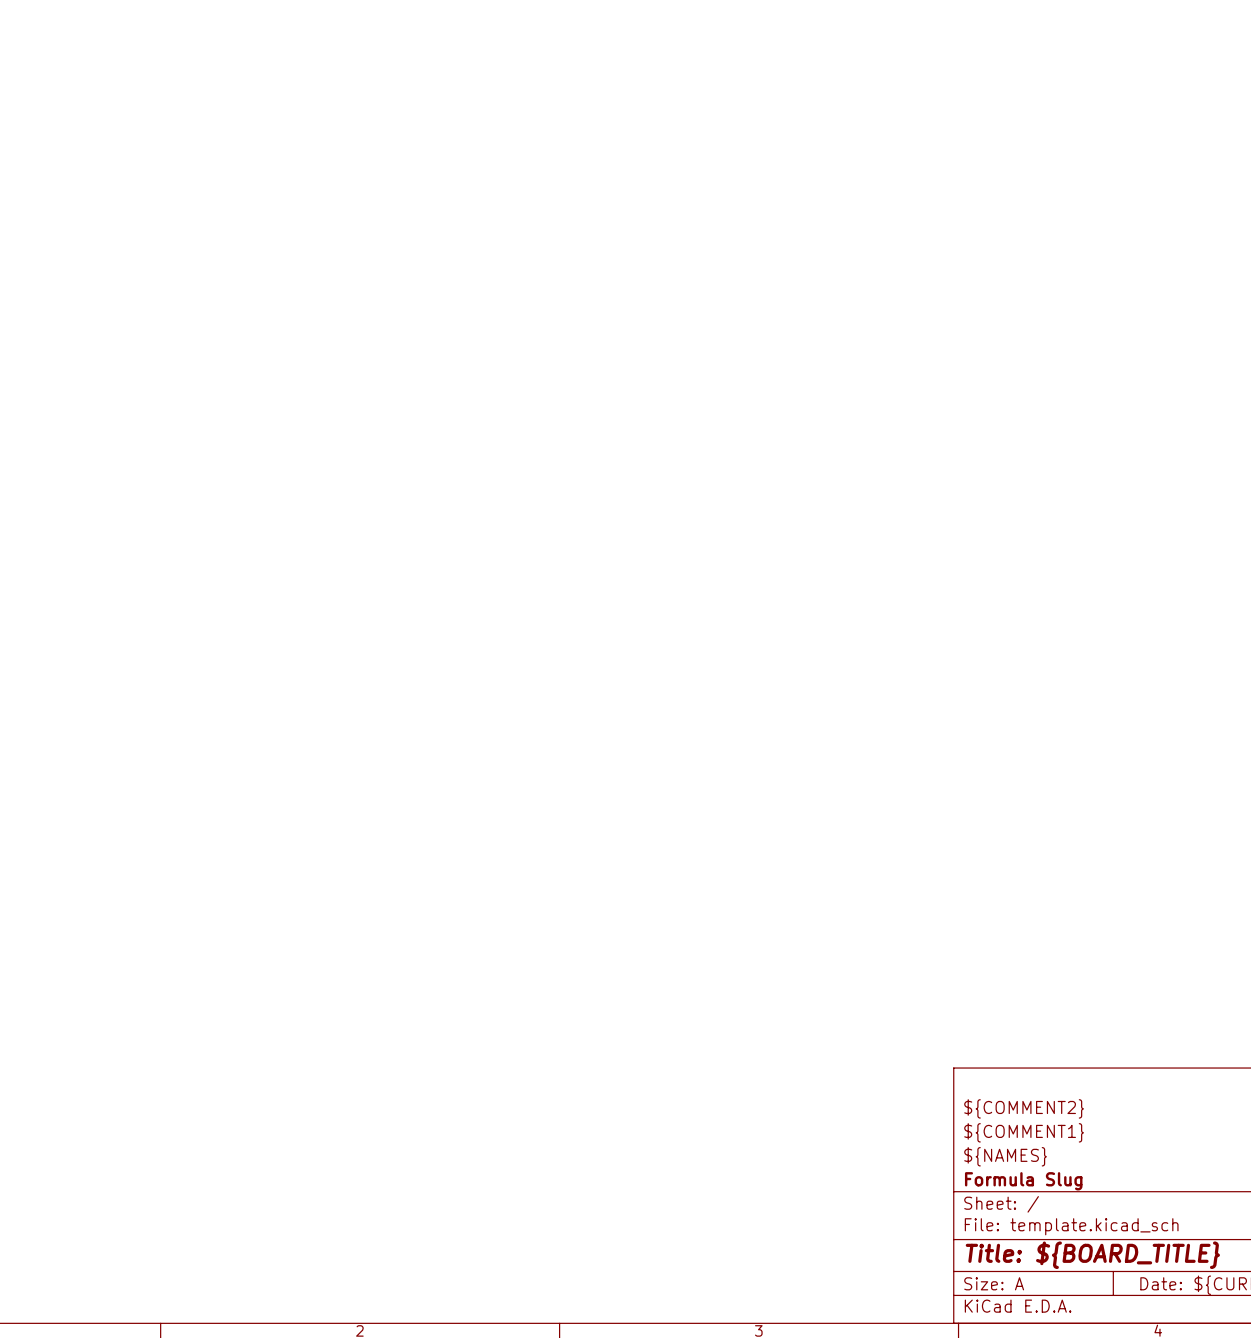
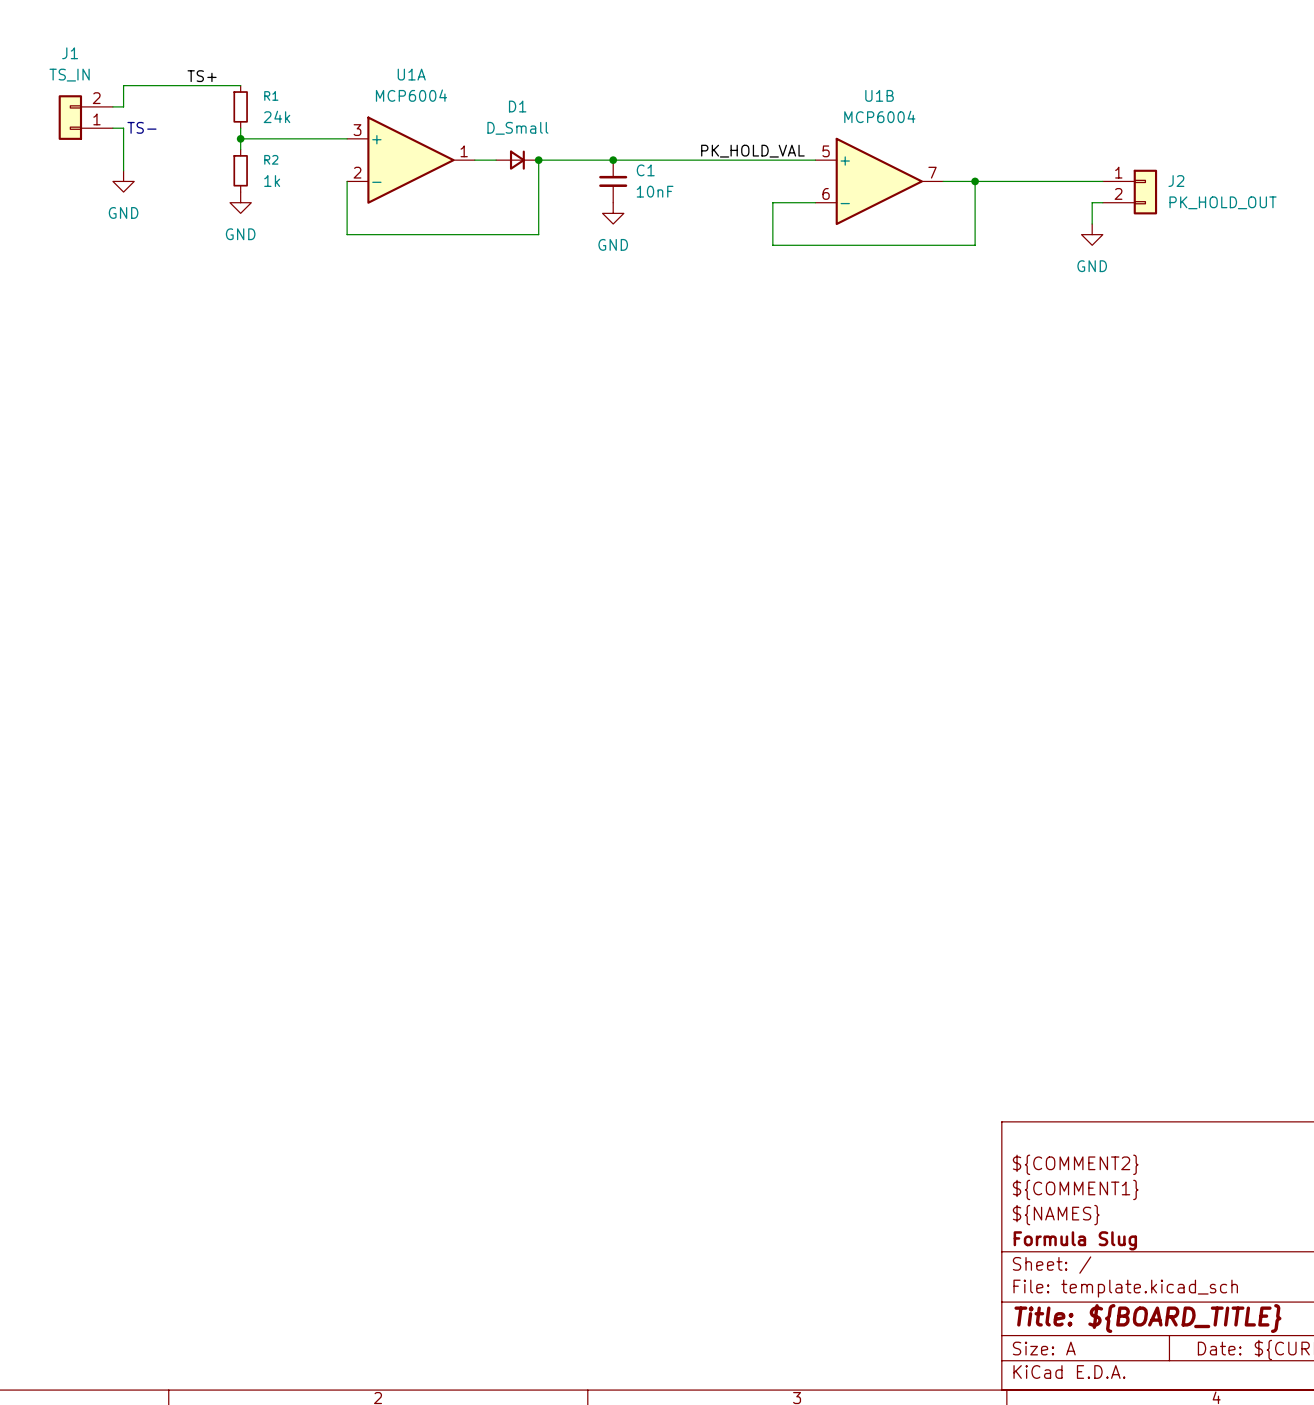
label: none -> TS+ (202, 76)
wire: none -> (240, 85) (123, 85) (123, 106) (112, 106)
R1: none -> 24k (240, 106)
J1: none -> TS_IN (85, 117)
text: none -> TS- (141, 127)
wire: none -> (112, 128) (123, 128) (123, 170)
wire: none -> (240, 128) (240, 149)
wire: none -> (240, 138) (347, 138)
junction: none -> (240, 138)
label: none -> PK_HOLD_VAL (752, 151)
U1A: none -> MCP6004 (410, 160)
wire: none -> (474, 160) (496, 160)
D1: none -> D_Small (517, 160)
junction: none -> (538, 160)
junction: none -> (613, 160)
wire: none -> (815, 160) (538, 160) (538, 234) (347, 234) (347, 181)
R2: none -> 1k (240, 170)
power symbol: none -> GND (123, 181)
C1: none -> 10nF (613, 181)
U1B: none -> MCP6004 (879, 181)
wire: none -> (943, 181) (1102, 181)
wire: none -> (975, 181) (975, 245) (772, 245) (772, 202) (815, 202)
junction: none -> (975, 181)
J2: none -> PK_HOLD_OUT (1129, 192)
power symbol: none -> GND (240, 202)
wire: none -> (1102, 202) (1092, 202) (1092, 224)
power symbol: none -> GND (613, 213)
power symbol: none -> GND (1092, 234)

